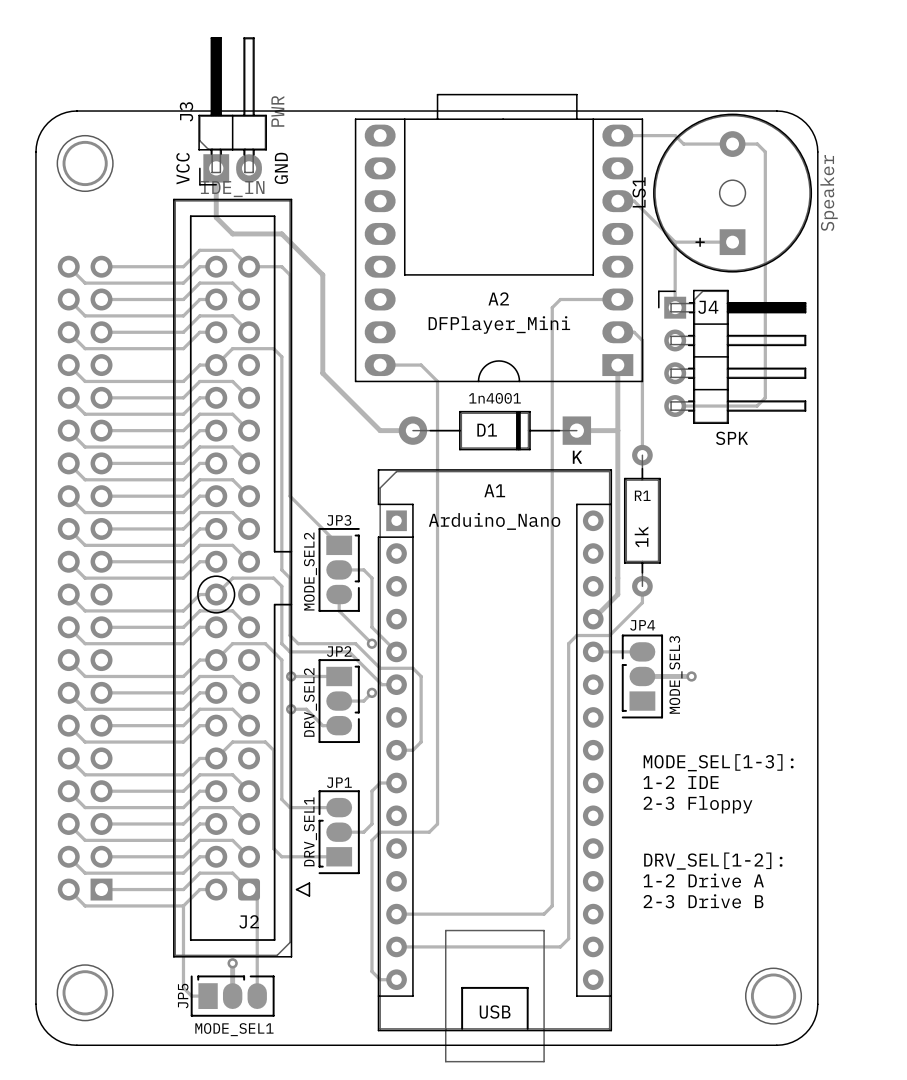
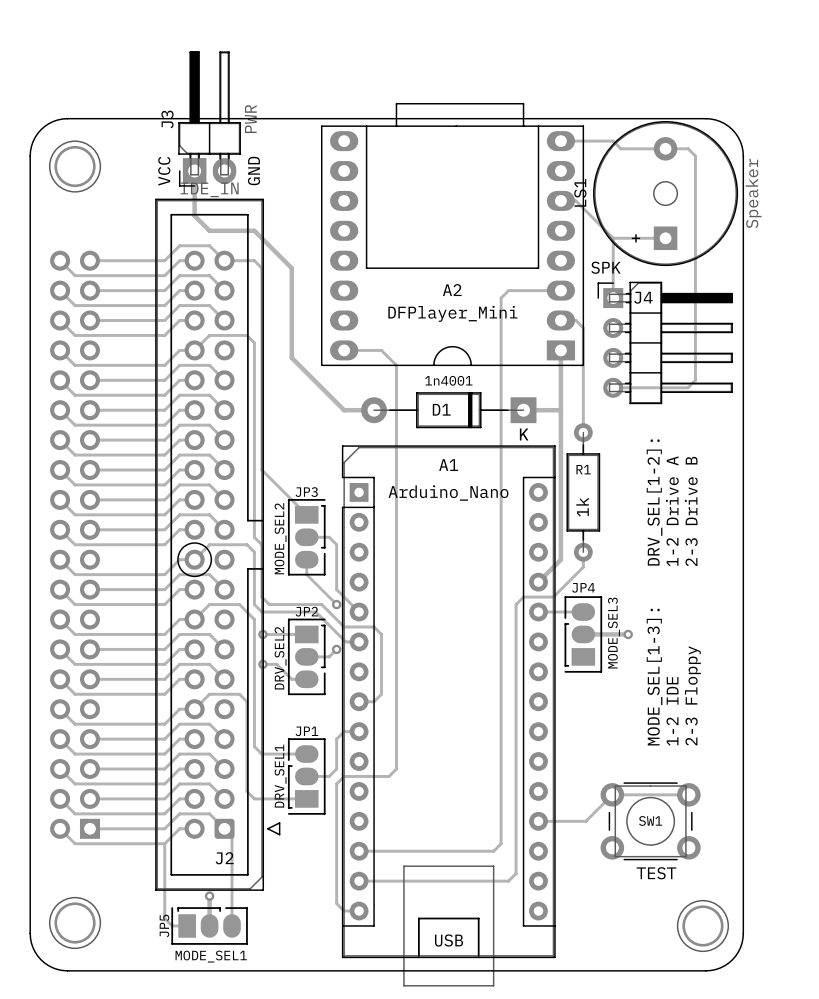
J4 value position: SPK (732, 438) -> SPK (605, 267)
text rotation: 0° (718, 762) -> 90° counterclockwise (654, 677)
text rotation: 0° (680, 782) -> 90° counterclockwise (672, 711)
text rotation: 0° (698, 804) -> 90° counterclockwise (692, 695)
track: none -> (688, 794) (612, 794) (585, 821) (538, 821)
text rotation: 0° (713, 861) -> 90° counterclockwise (654, 502)
text position: DRV_SEL[1-2]: (713, 861) -> DRV_SEL[1-2]: (654, 502)
text rotation: 0° (703, 880) -> 90° counterclockwise (672, 511)
text position: 1-2 Drive A (703, 880) -> 1-2 Drive A (672, 511)
SW1: none -> TEST (650, 821)
text rotation: 0° (703, 901) -> 90° counterclockwise (691, 511)
text position: 2-3 Drive B (703, 901) -> 2-3 Drive B (691, 511)

